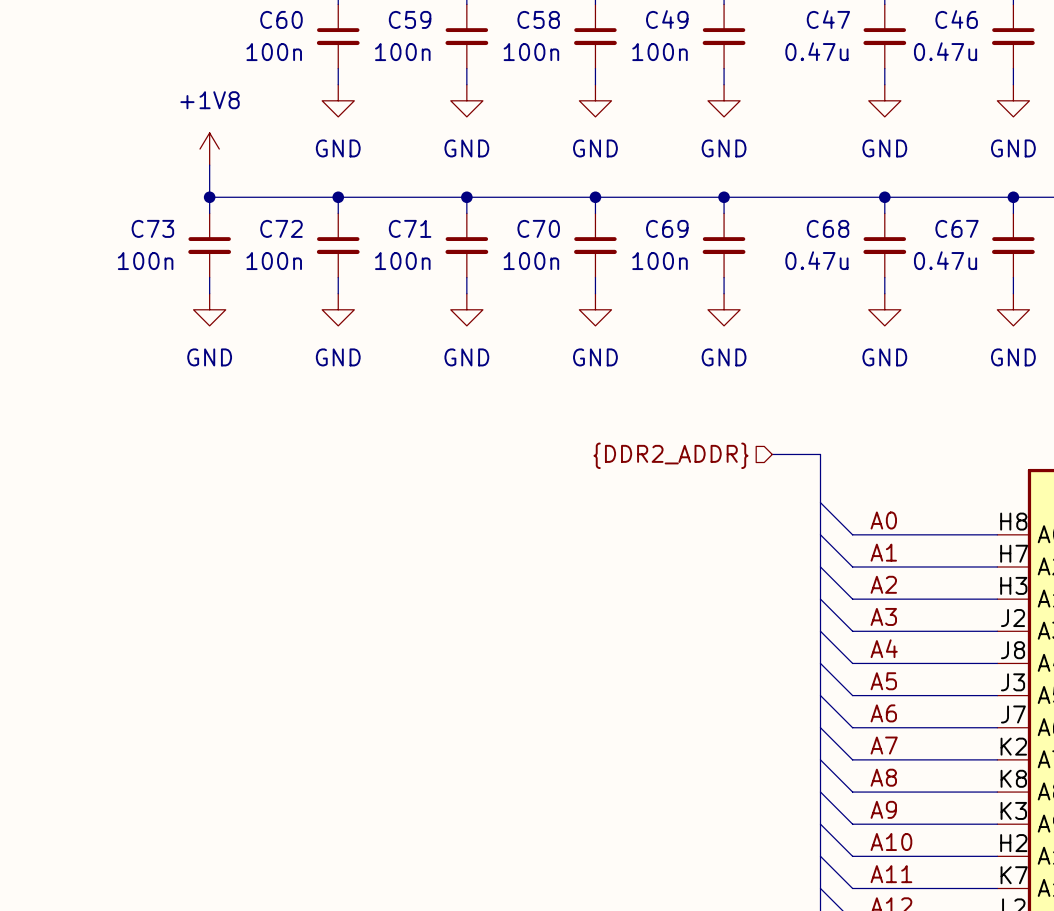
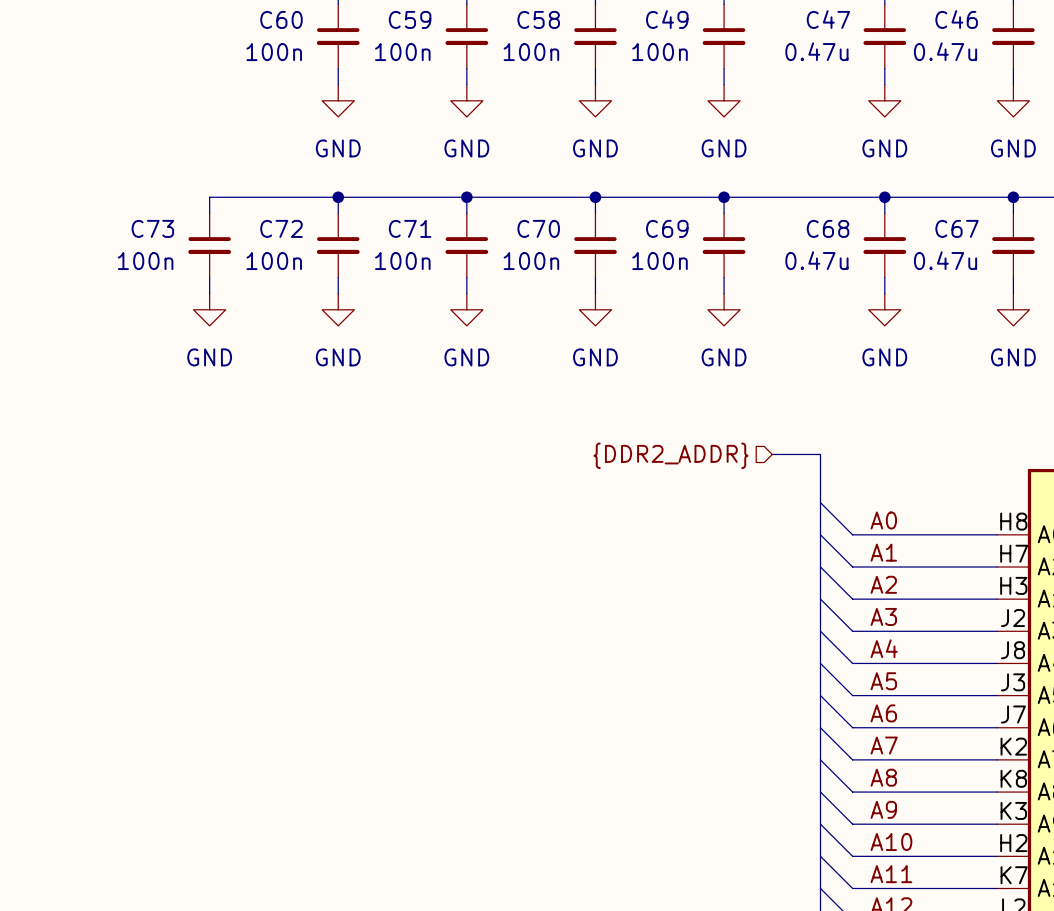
power symbol: +1V8 (209, 149) -> none
wire: (209, 165) (209, 197) -> none
junction: (209, 197) -> none

